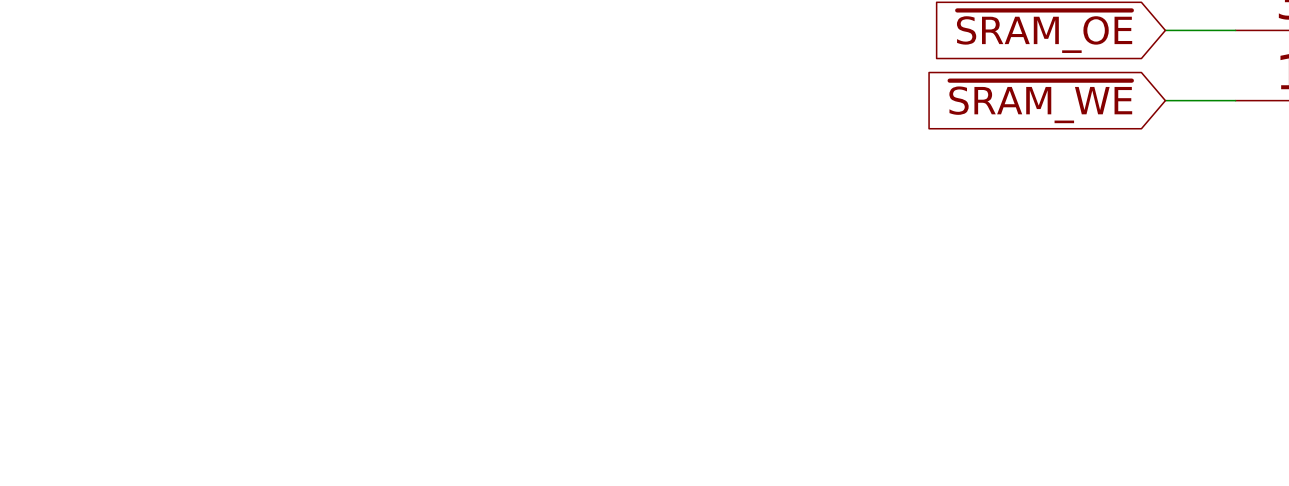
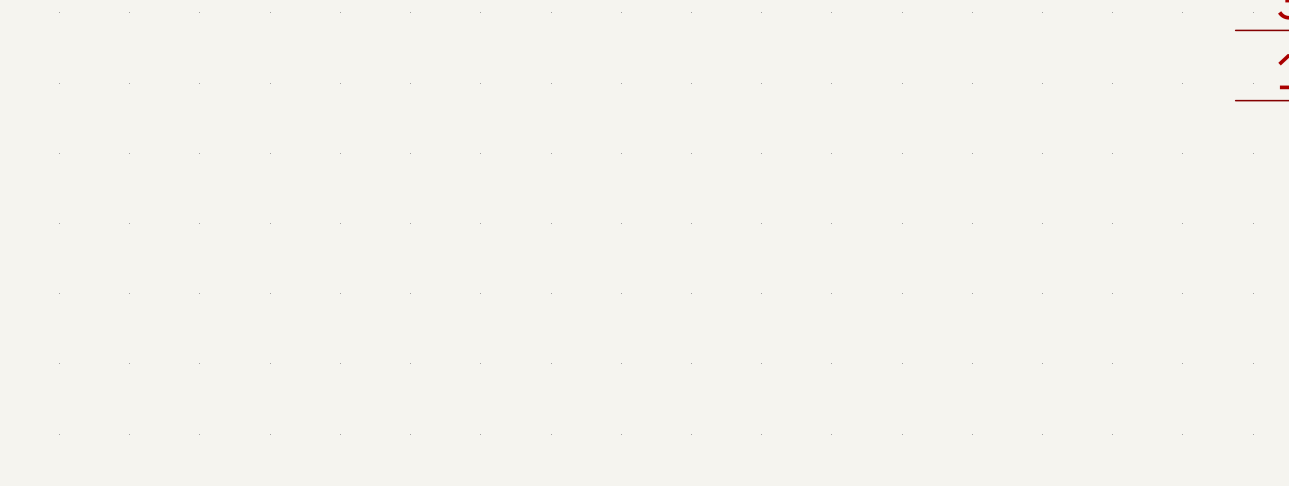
wire: (1165, 30) (1235, 30) -> none
global label: ~{SRAM_OE} (1044, 31) -> none
wire: (1165, 100) (1235, 100) -> none
global label: ~{SRAM_WE} (1040, 101) -> none

